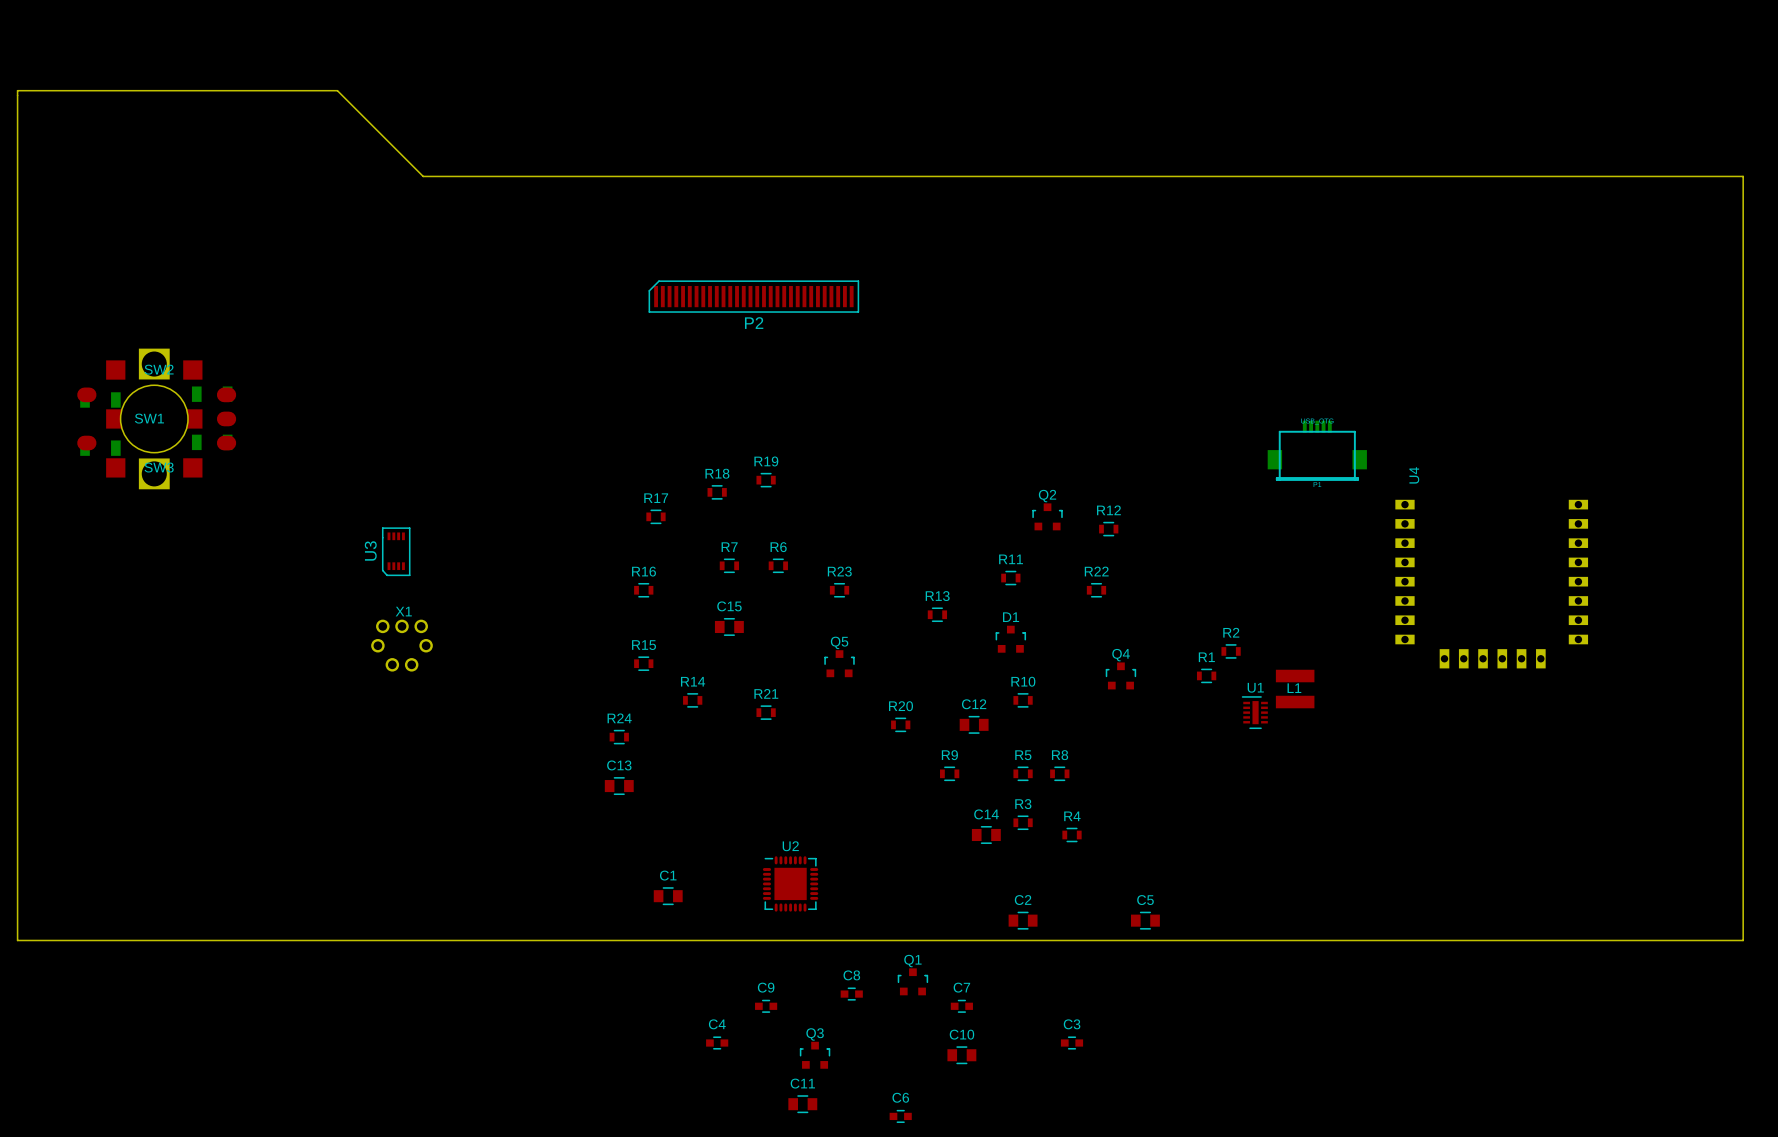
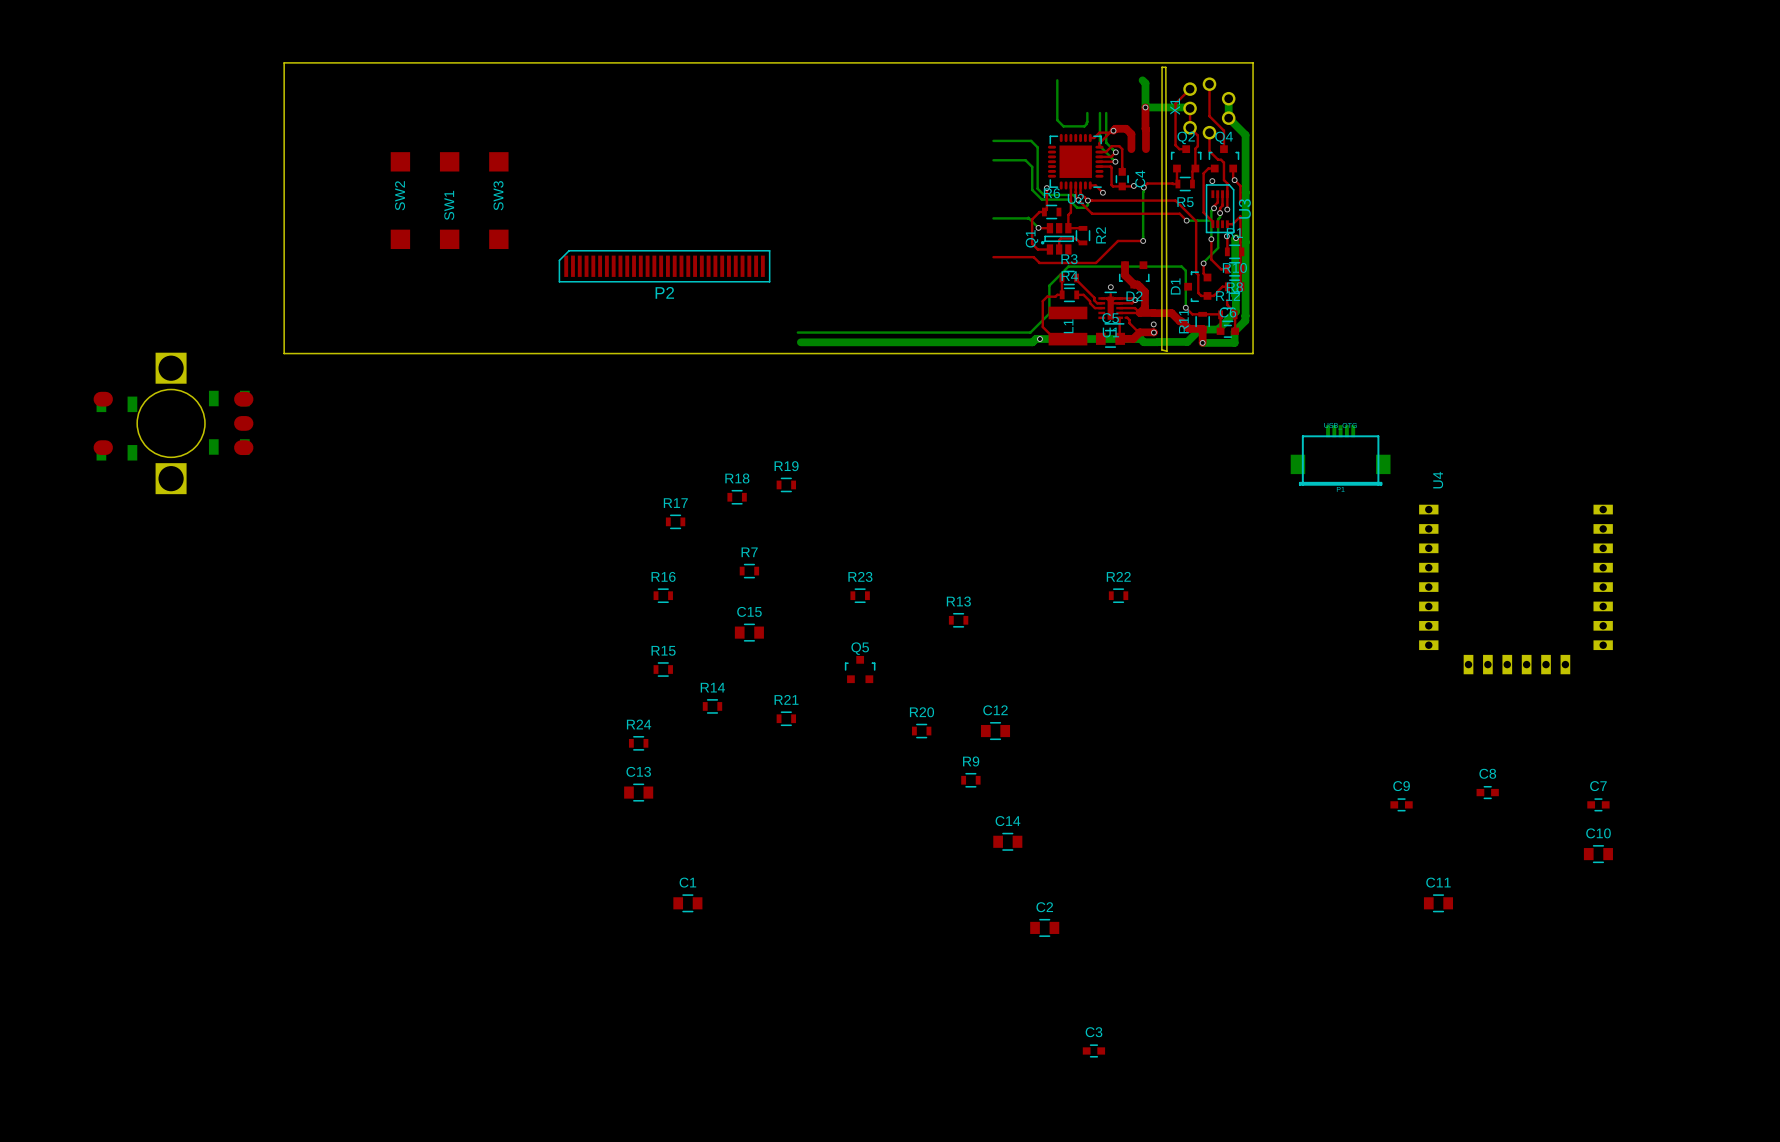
board edge: none -> (284, 62) (284, 353) (1253, 353) (1253, 62) (284, 62)
bottom track: none -> (1057, 80) (1057, 120) (1063, 126) (1084, 126) (1087, 121) (1087, 113)
bottom track: none -> (1142, 80) (1145, 83) (1145, 107) (1190, 108)
top track: none -> (1209, 84) (1209, 116) (1223, 130) (1223, 149)
top track: none -> (1190, 89) (1175, 103) (1175, 145) (1179, 149) (1186, 149)
board edge: (17, 90) (17, 940) (1743, 940) (1743, 176) (423, 176) (337, 90) (17, 90) -> none
bottom track: none -> (1228, 98) (1228, 118) (1245, 135) (1245, 192)
top track: none -> (1145, 107) (1145, 149)
via: none -> (1145, 107)
top track: none -> (1190, 108) (1190, 127) (1197, 135) (1192, 184)
bottom track: none -> (1099, 113) (1099, 146) (1115, 161)
bottom track: none -> (1106, 113) (1106, 142) (1115, 152)
top track: none -> (1113, 130) (1099, 143) (1099, 147)
top track: none -> (1113, 130) (1111, 132) (1099, 132) (1094, 137) (1090, 137)
top track: none -> (1113, 130) (1115, 128) (1126, 128) (1131, 134) (1131, 149)
via: none -> (1113, 130)
top track: none -> (1209, 132) (1209, 151) (1223, 162) (1223, 180) (1227, 183) (1227, 209)
bottom track: none -> (993, 140) (1031, 140) (1037, 147) (1037, 188) (1043, 194) (1073, 194) (1078, 200)
top track: none -> (1099, 152) (1106, 152) (1111, 146) (1119, 146) (1122, 149) (1122, 171)
top track: none -> (1115, 152) (1111, 156) (1099, 156)
via: none -> (1115, 152)
bottom track: none -> (993, 160) (1025, 160) (1032, 166) (1032, 189) (1041, 199) (1068, 199) (1077, 207) (1085, 207) (1087, 205) (1087, 200)
top track: none -> (1099, 161) (1115, 161)
via: none -> (1115, 161)
top track: none -> (1099, 166) (1111, 167) (1113, 186) (1133, 185)
top track: none -> (1176, 168) (1177, 184) (1147, 183) (1143, 187)
top track: none -> (1214, 168) (1208, 168) (1203, 173) (1203, 212) (1212, 221) (1212, 224)
top track: none -> (1233, 168) (1233, 178) (1240, 185) (1240, 201)
via: none -> (1212, 181)
via: none -> (1234, 180)
top track: none -> (1070, 185) (1070, 212) (1068, 214) (1068, 228) (1082, 228)
top track: none -> (1075, 185) (1075, 197) (1092, 213) (1179, 213) (1186, 220)
top track: none -> (1080, 185) (1080, 193) (1087, 200) (1175, 200) (1196, 221) (1196, 272) (1198, 274) (1198, 293) (1201, 295) (1213, 295) (1222, 286) (1227, 286)
top track: none -> (1090, 185) (1095, 185) (1102, 192)
via: none -> (1133, 185)
top track: none -> (1046, 188) (1046, 209) (1044, 212) (1039, 212) (1032, 219) (1032, 243) (1037, 249) (1049, 249)
via: none -> (1046, 188)
bottom track: none -> (1143, 187) (1143, 240)
via: none -> (1143, 187)
via: none -> (1102, 192)
bottom track: none -> (1245, 192) (1245, 242)
top track: none -> (1217, 194) (1217, 202) (1214, 208)
top track: none -> (1222, 194) (1220, 213)
via: none -> (1078, 200)
via: none -> (1087, 200)
bottom track: none -> (1214, 208) (1211, 210) (1211, 239)
via: none -> (1214, 208)
via: none -> (1227, 209)
bottom track: none -> (1220, 213) (1218, 219) (1218, 247) (1203, 263)
via: none -> (1220, 213)
bottom track: none -> (993, 218) (1028, 217) (1038, 227)
bottom track: none -> (1186, 220) (1211, 220)
via: none -> (1186, 220)
top track: none -> (1227, 224) (1232, 224) (1240, 216) (1241, 286)
top track: none -> (1038, 227) (1049, 228)
via: none -> (1038, 227)
top track: none -> (1226, 236) (1227, 251)
via: none -> (1226, 236)
bottom track: none -> (1235, 238) (1235, 311) (1218, 329) (1199, 329) (1187, 341) (1143, 342) (1140, 339) (1035, 339) (1032, 342) (800, 342)
via: none -> (1235, 238)
top track: none -> (1211, 239) (1211, 259) (1221, 269) (1227, 269)
via: none -> (1211, 239)
top track: none -> (1143, 240) (1117, 240) (1095, 262) (1039, 262) (1033, 257) (993, 257)
via: none -> (1143, 240)
bottom track: none -> (1245, 242) (1245, 320) (1234, 331) (1234, 342) (1202, 342)
top track: none -> (1082, 242) (1075, 238) (1060, 238) (1059, 249)
top track: none -> (1203, 263) (1203, 273) (1207, 277)
via: none -> (1203, 263)
top track: none -> (1125, 265) (1125, 275) (1134, 284) (1139, 286)
D2: none -> (1134, 274)
top track: none -> (1061, 277) (1062, 294) (1047, 296) (1042, 301) (1042, 327) (1054, 339) (1067, 339)
top track: none -> (1076, 277) (1094, 297) (1094, 300) (1097, 303) (1101, 303)
via: none -> (1110, 287)
top track: none -> (1139, 286) (1145, 291) (1145, 307) (1139, 312)
top track: none -> (1110, 294) (1110, 302) (1114, 298) (1133, 298) (1135, 300) (1132, 303) (1111, 303) (1106, 298) (1101, 298)
top track: none -> (1076, 294) (1083, 294) (1094, 308) (1101, 308)
P2 position: (753, 296) -> (664, 266)
via: none -> (1135, 300)
top track: none -> (1227, 300) (1227, 304) (1235, 312) (1235, 331)
bottom track: none -> (1185, 307) (1185, 270) (1181, 266) (1068, 266) (1049, 285) (1049, 313) (1030, 332) (797, 332)
top track: none -> (1185, 307) (1192, 314) (1220, 314) (1220, 331)
via: none -> (1185, 307)
top track: none -> (1119, 308) (1135, 308) (1139, 312)
top track: none -> (1119, 312) (1139, 312)
top track: none -> (1139, 312) (1171, 313) (1189, 328) (1202, 328) (1202, 342)
top track: none -> (1119, 317) (1120, 338) (1133, 338) (1139, 332)
top track: none -> (1125, 317) (1139, 332)
via: none -> (1153, 324)
top track: none -> (1139, 332) (1153, 332)
via: none -> (1153, 332)
via: none -> (1039, 339)
via: none -> (1202, 342)
board edge: none -> (1166, 351) (1165, 67) (1162, 67) (1161, 349) (1166, 351)
SW2 rotation: 0° (154, 370) -> 90° clockwise (400, 200)
SW2 position: (154, 370) -> (400, 200)
SW1 rotation: 0° (154, 418) -> 90° clockwise (449, 200)
SW1 position: (154, 418) -> (449, 200)
SW3 rotation: 0° (154, 467) -> 90° clockwise (498, 200)
SW3 position: (154, 467) -> (498, 200)
Q2 position: (1047, 516) -> (1186, 158)
R12 position: (1108, 529) -> (1227, 314)
U3 rotation: 0° (396, 551) -> 180° (1220, 208)
U3 position: (396, 551) -> (1220, 208)
R11 name position: R11 (1011, 559) -> R11 (1183, 321)
R6 position: (778, 565) -> (1051, 212)
R11 rotation: 0° (1010, 578) -> 90° clockwise (1202, 321)
R11 position: (1010, 578) -> (1202, 321)
D1 rotation: 0° (1010, 639) -> 90° counterclockwise (1197, 286)
D1 position: (1010, 639) -> (1197, 286)
X1 rotation: 0° (402, 645) -> 90° counterclockwise (1209, 108)
X1 position: (402, 645) -> (1209, 108)
R2 rotation: 0° (1231, 651) -> 90° clockwise (1082, 235)
R2 position: (1231, 651) -> (1082, 235)
Q4 position: (1120, 675) -> (1223, 158)
R1 position: (1206, 675) -> (1234, 251)
L1 name rotation: 0° (1294, 688) -> 90° counterclockwise (1068, 326)
L1 position: (1295, 689) -> (1067, 326)
R10 position: (1023, 700) -> (1234, 286)
U1 rotation: 0° (1254, 712) -> 180° (1111, 308)
U1 position: (1254, 712) -> (1111, 308)
R5 name position: R5 (1023, 755) -> R5 (1185, 202)
R8 name position: R8 (1060, 755) -> R8 (1234, 287)
R5 position: (1023, 773) -> (1185, 184)
R8 position: (1059, 773) -> (1234, 269)
R3 position: (1023, 822) -> (1069, 277)
R4 position: (1072, 834) -> (1069, 294)
U2 rotation: 0° (790, 883) -> 180° (1075, 161)
U2 position: (790, 883) -> (1075, 161)
C5 position: (1145, 920) -> (1110, 338)
Q1 name position: Q1 (912, 961) -> Q1 (1031, 238)
Q1 footprint: [897, 968, 929, 996] -> [1040, 223, 1074, 255]
C8 position: (851, 994) -> (1487, 792)
C9 position: (766, 1006) -> (1401, 804)
C7 position: (961, 1006) -> (1598, 804)
C4 rotation: 0° (717, 1043) -> 90° clockwise (1122, 179)
C4 position: (717, 1043) -> (1122, 179)
Q3: (815, 1055) -> none
C10 position: (961, 1055) -> (1598, 854)
C11 position: (802, 1104) -> (1438, 903)
C6 position: (900, 1116) -> (1227, 331)

